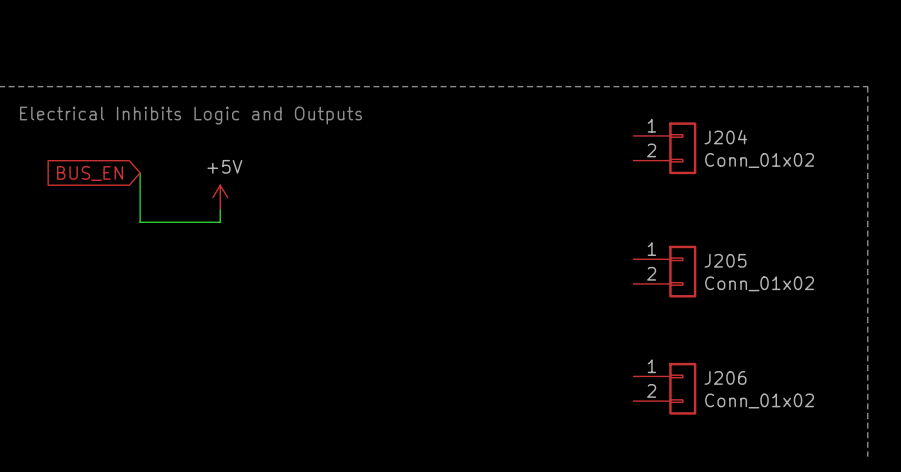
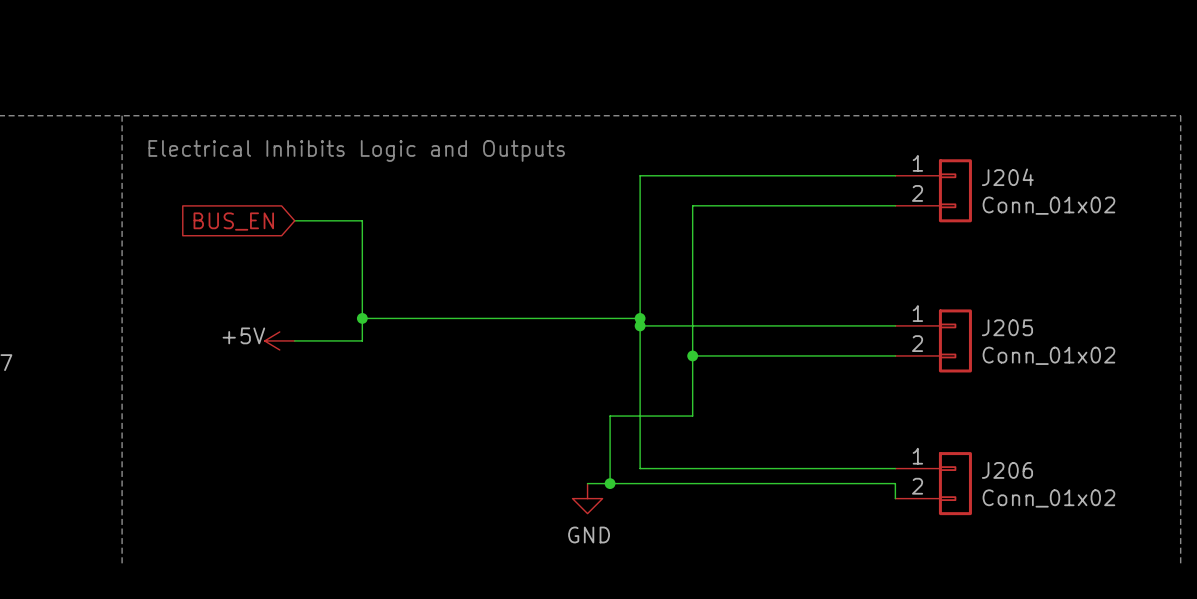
wire: none -> (895, 175) (640, 175) (640, 468) (895, 468)
wire: none -> (895, 205) (692, 205) (692, 416) (610, 416) (610, 483)
wire: (140, 172) (140, 222) (220, 222) (220, 209) -> (294, 220) (362, 220) (362, 340) (294, 340)
power symbol rotation: 0° (220, 197) -> 90° counterclockwise (279, 340)
power symbol position: +5V (220, 197) -> +5V (279, 340)
wire: none -> (362, 318) (640, 318)
junction: none -> (362, 318)
junction: none -> (640, 318)
wire: none -> (640, 325) (895, 325)
junction: none -> (640, 325)
wire: none -> (692, 355) (895, 355)
junction: none -> (692, 355)
wire: none -> (587, 483) (895, 483) (895, 498)
junction: none -> (610, 483)
power symbol: none -> GND (587, 498)

